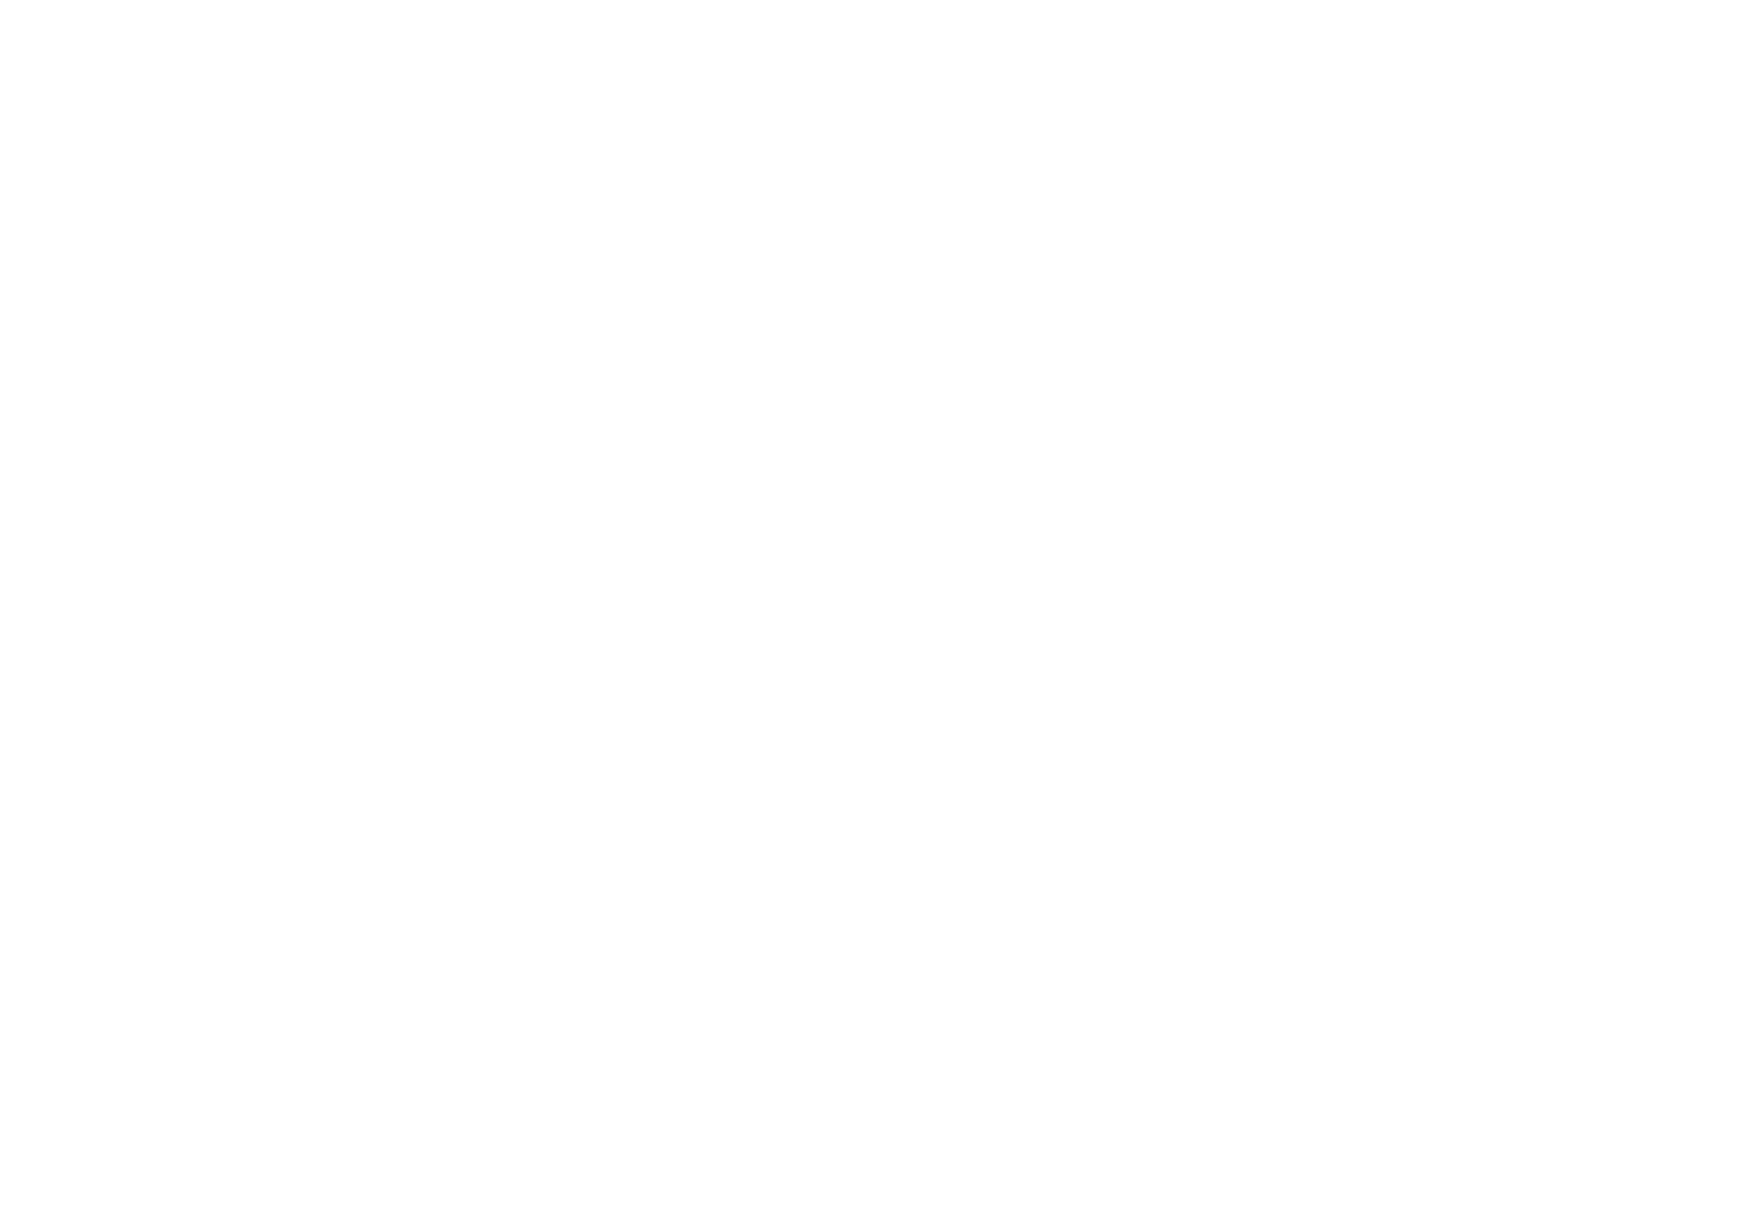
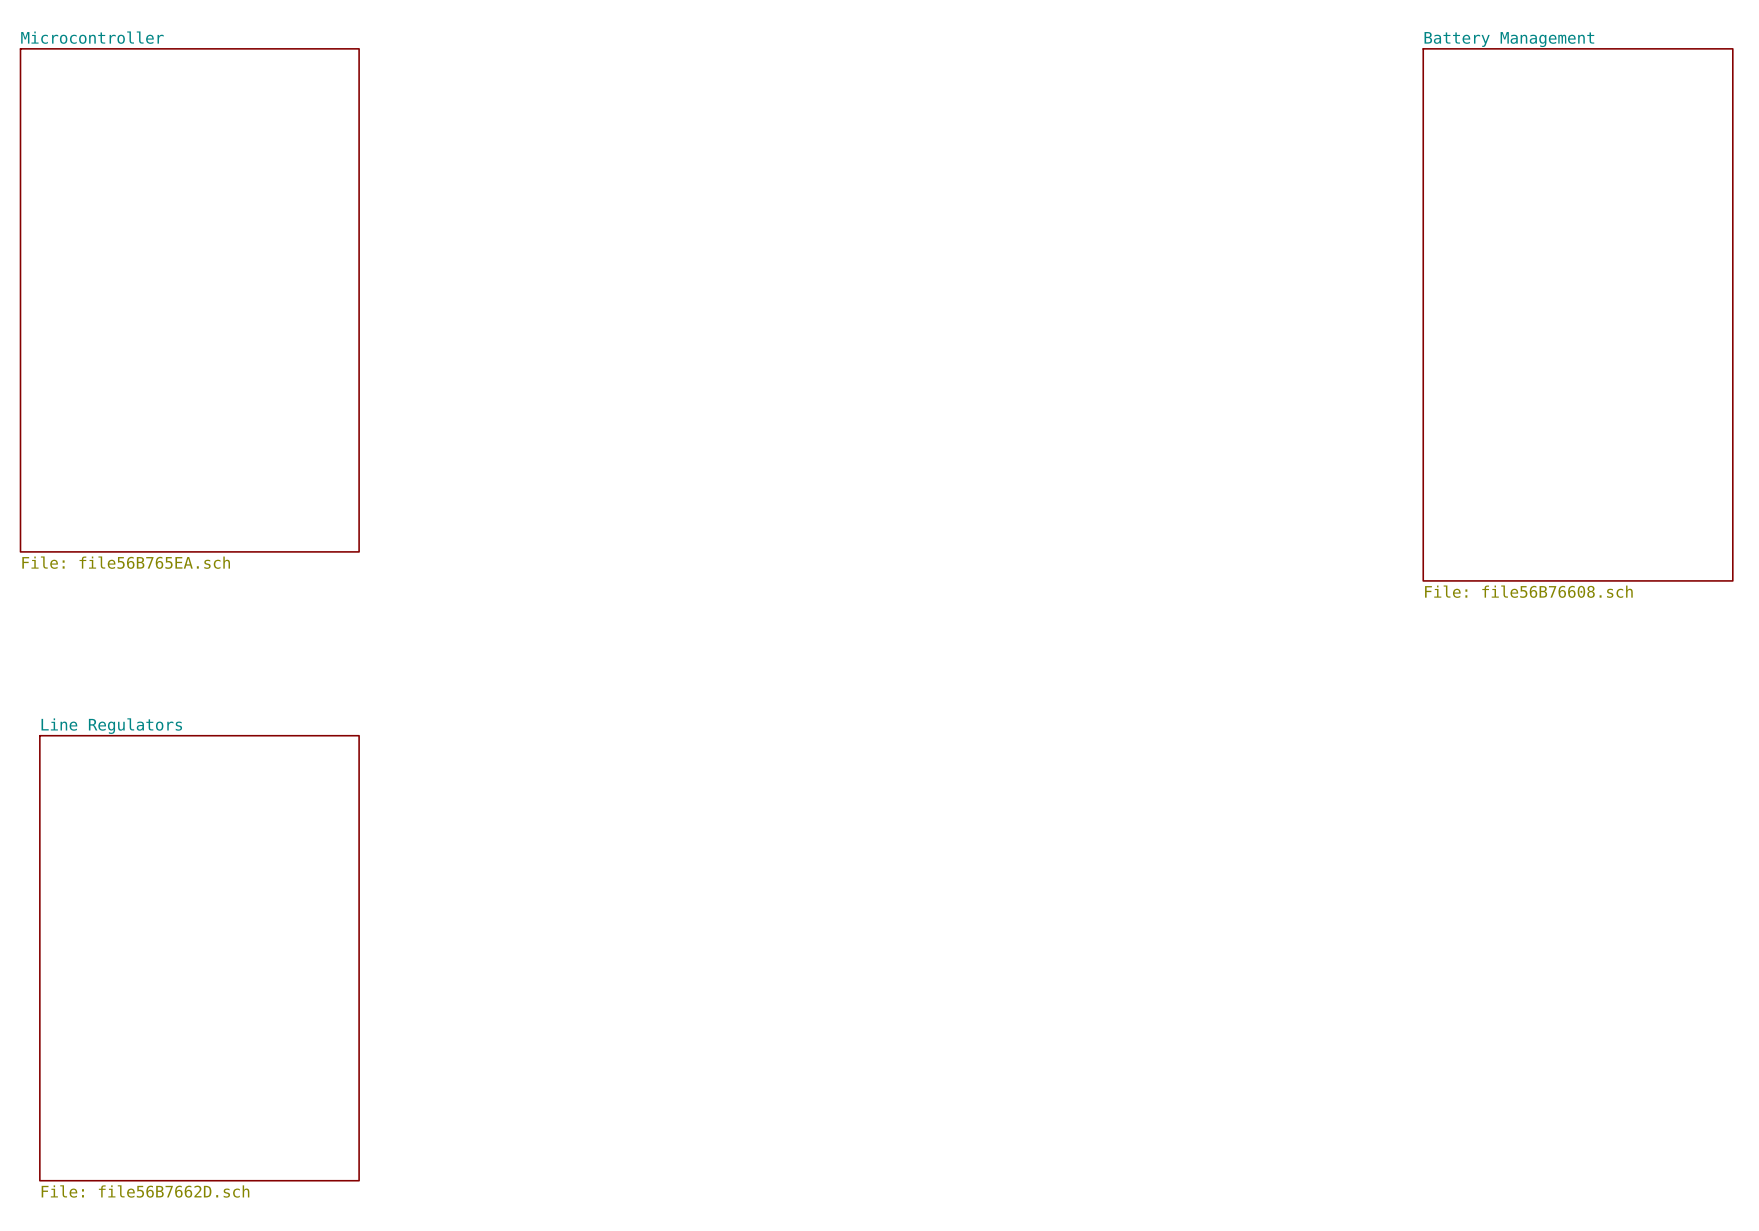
sheet Microcontroller: none -> File: file56B765EA.sch (189, 300)
sheet Battery Management: none -> File: file56B76608.sch (1578, 314)
sheet Line Regulators: none -> File: file56B7662D.sch (199, 958)

